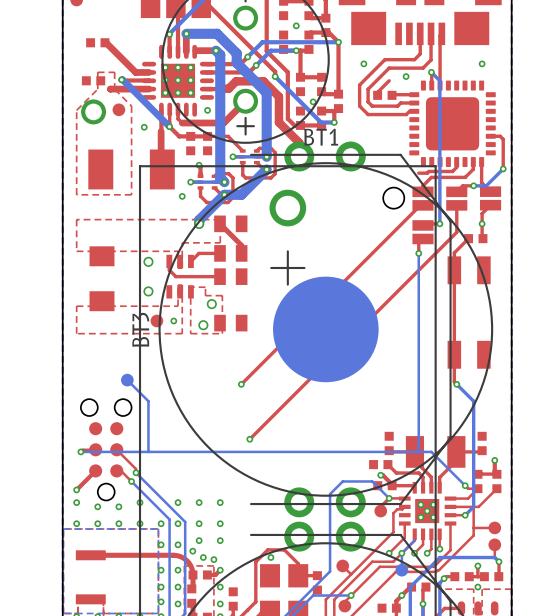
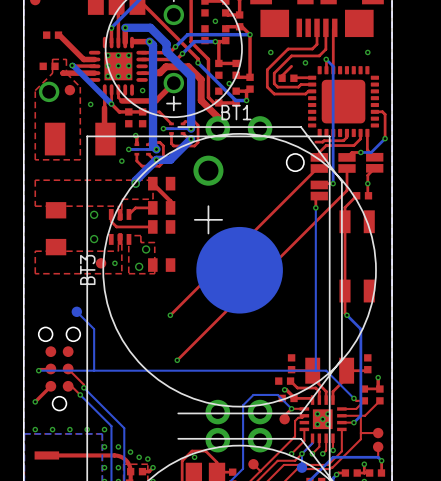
via: (76, 502) -> none
via: (140, 502) -> none
via: (178, 502) -> none
via: (199, 502) -> none
via: (220, 502) -> none
via: (97, 506) -> none
via: (118, 506) -> none
via: (178, 523) -> none
via: (199, 523) -> none
via: (220, 523) -> none
via: (199, 540) -> none
via: (220, 540) -> none

